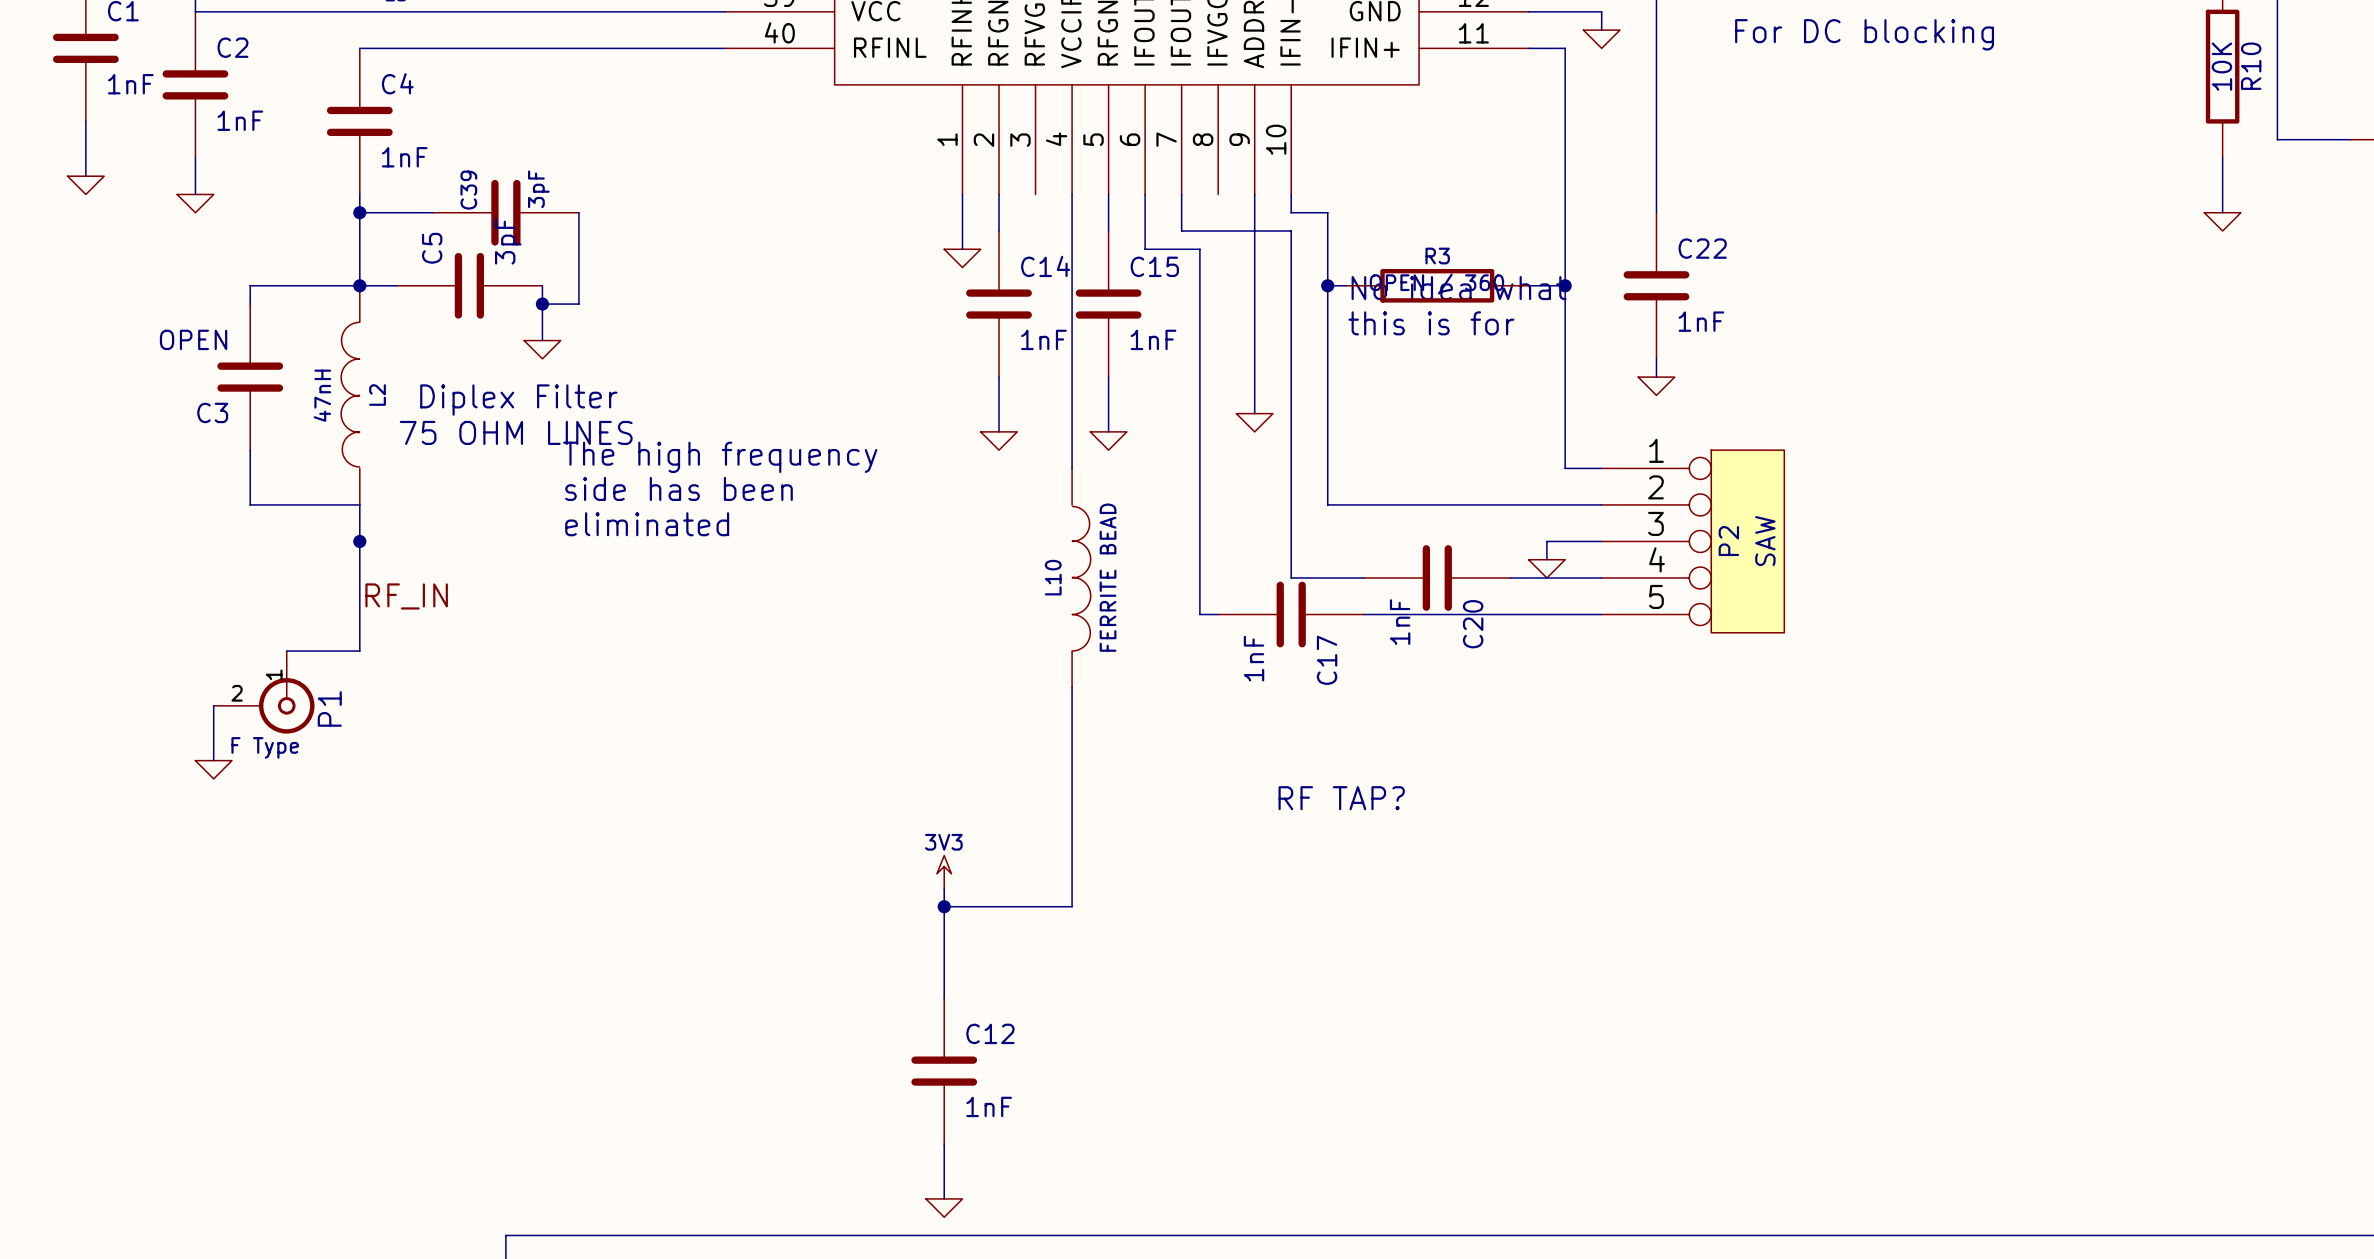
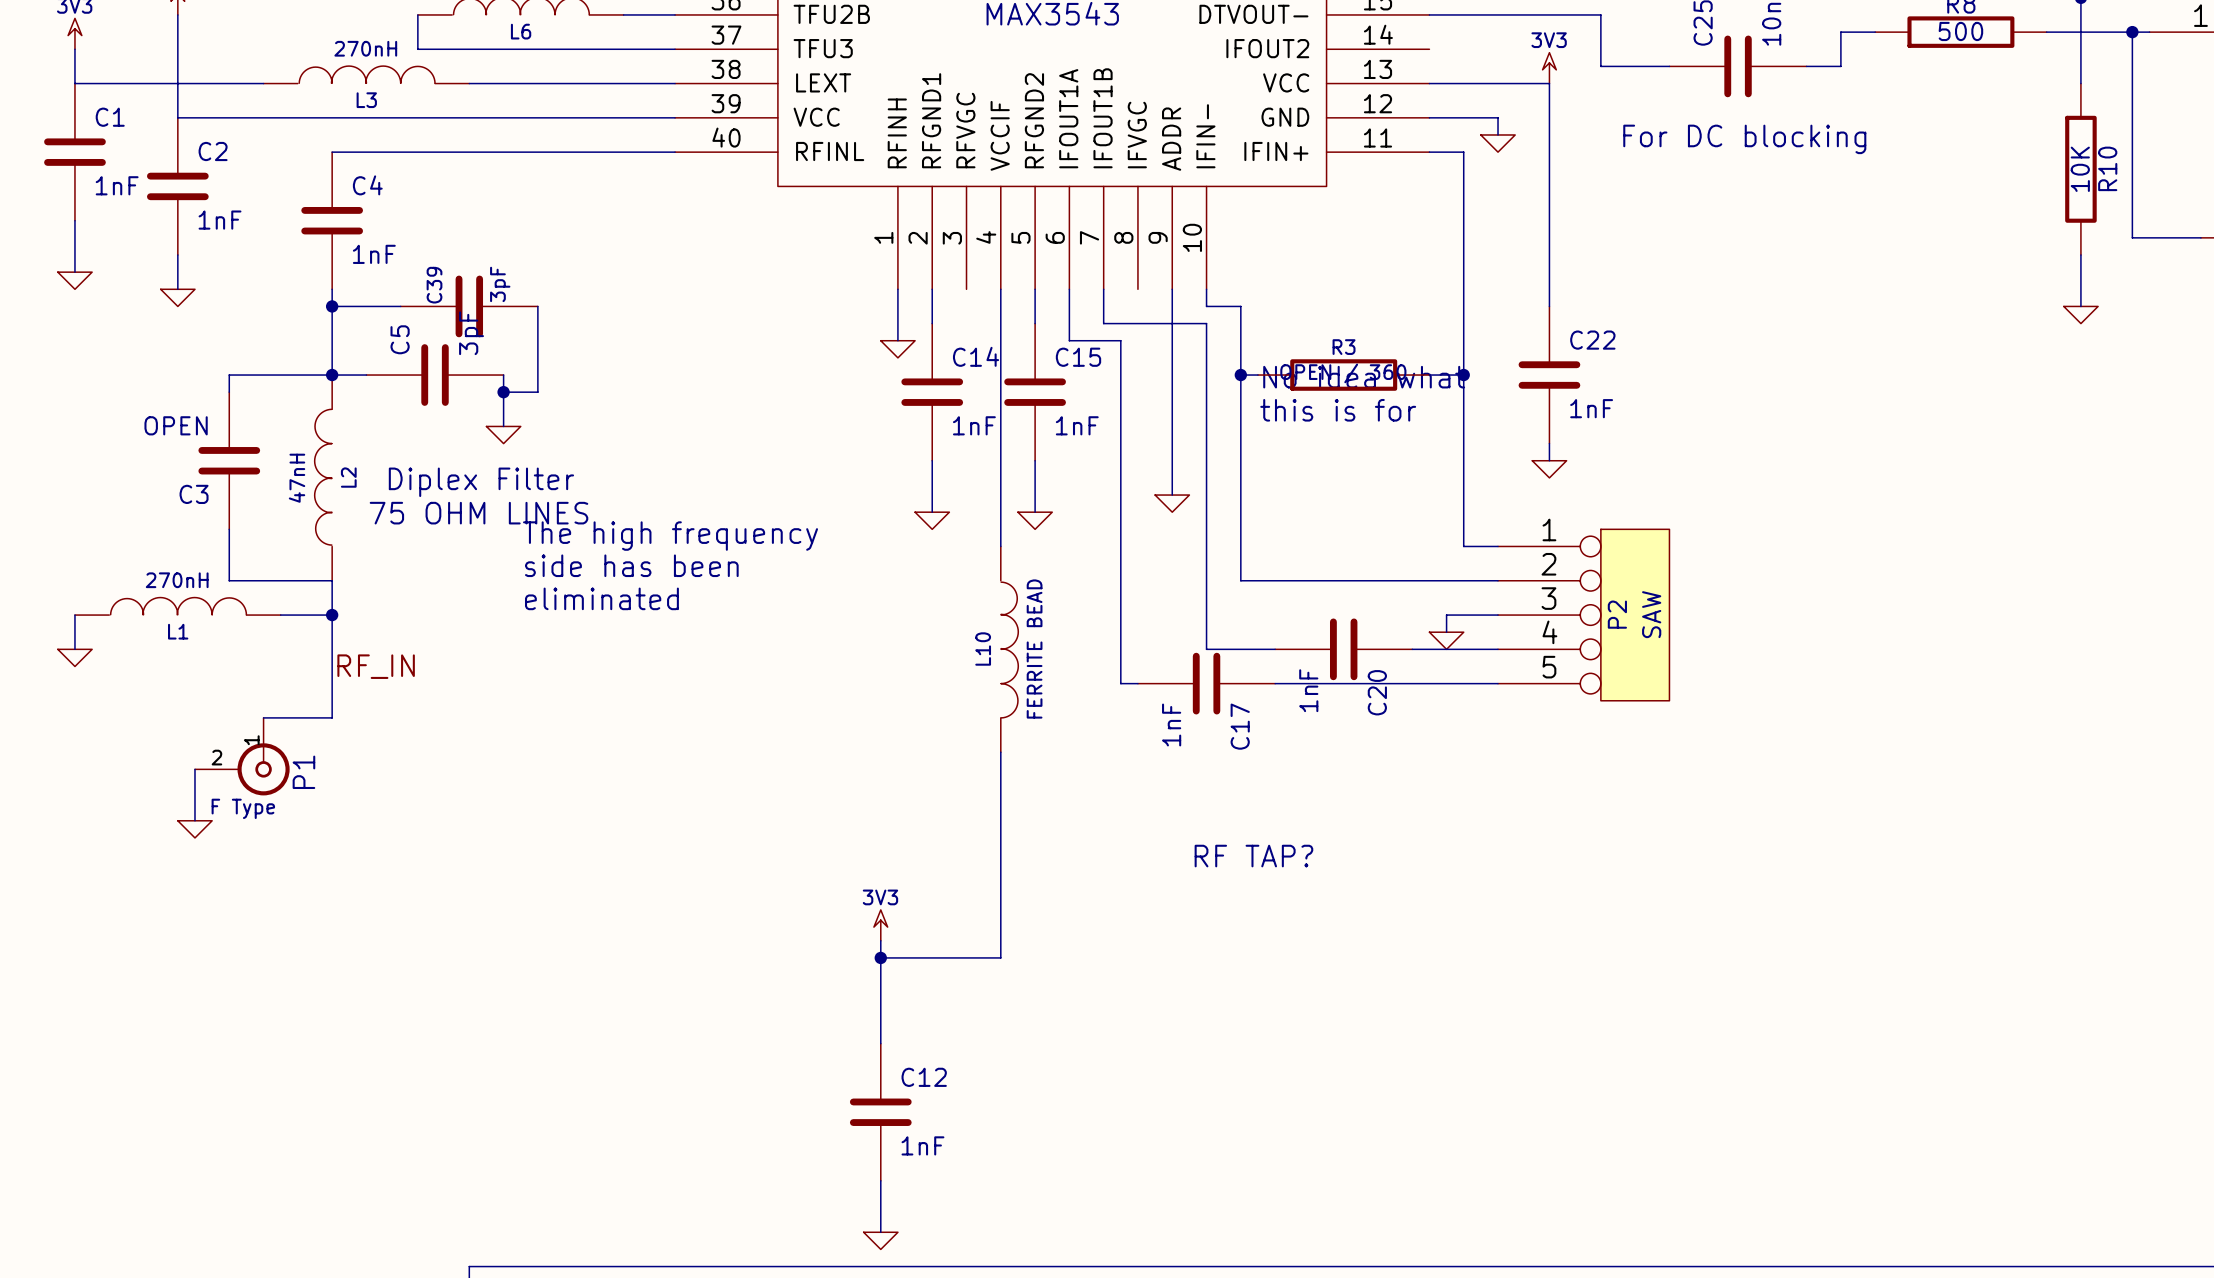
L1: none -> 270nH (177, 606)
wire: none -> (74, 615) (74, 649)
wire: none -> (280, 615) (332, 615)
power symbol: none -> (74, 657)

